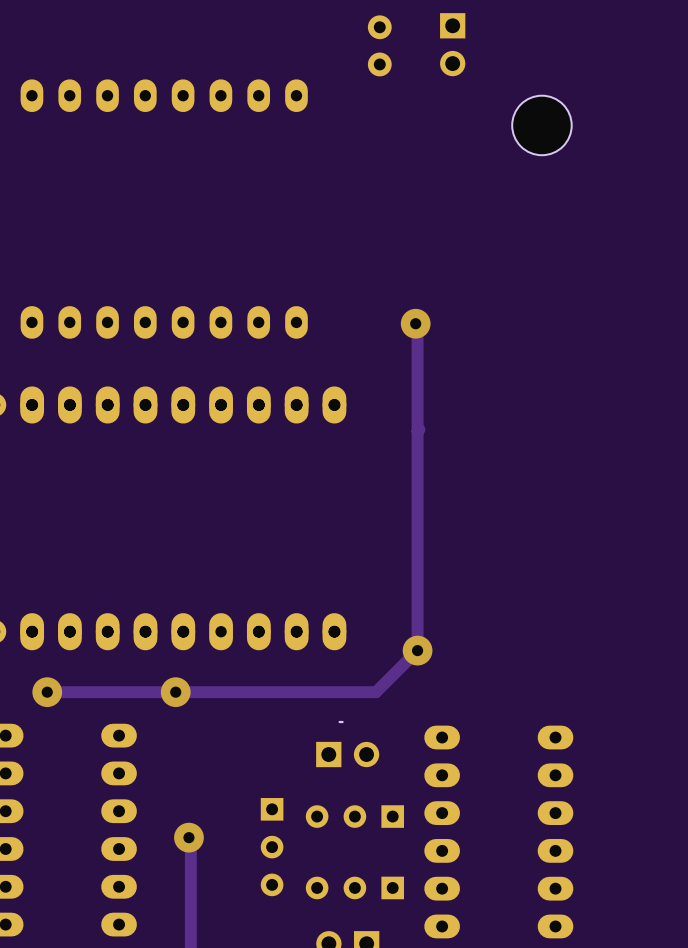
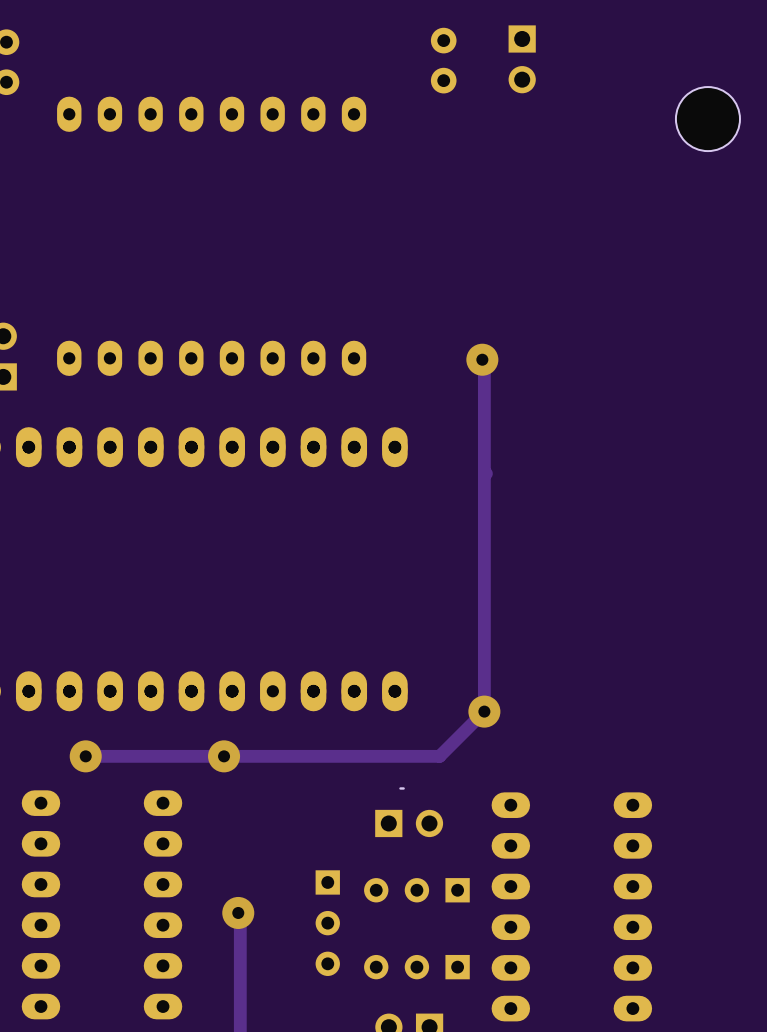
part position: (541, 125) -> (707, 119)

